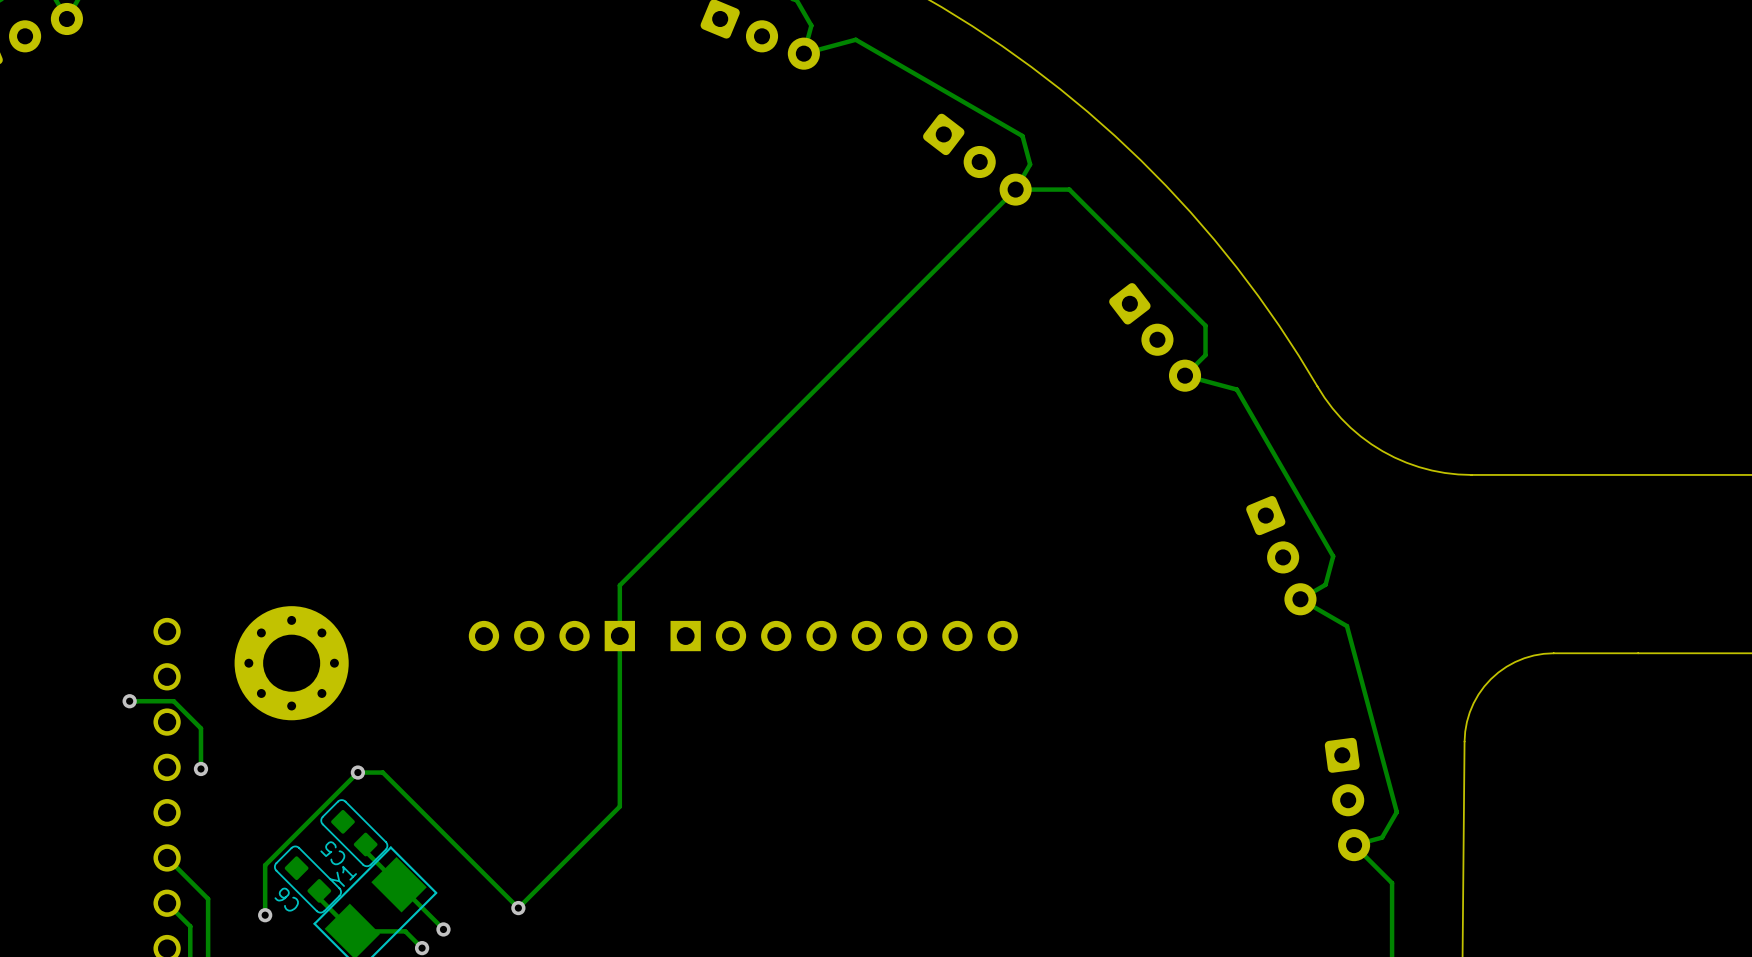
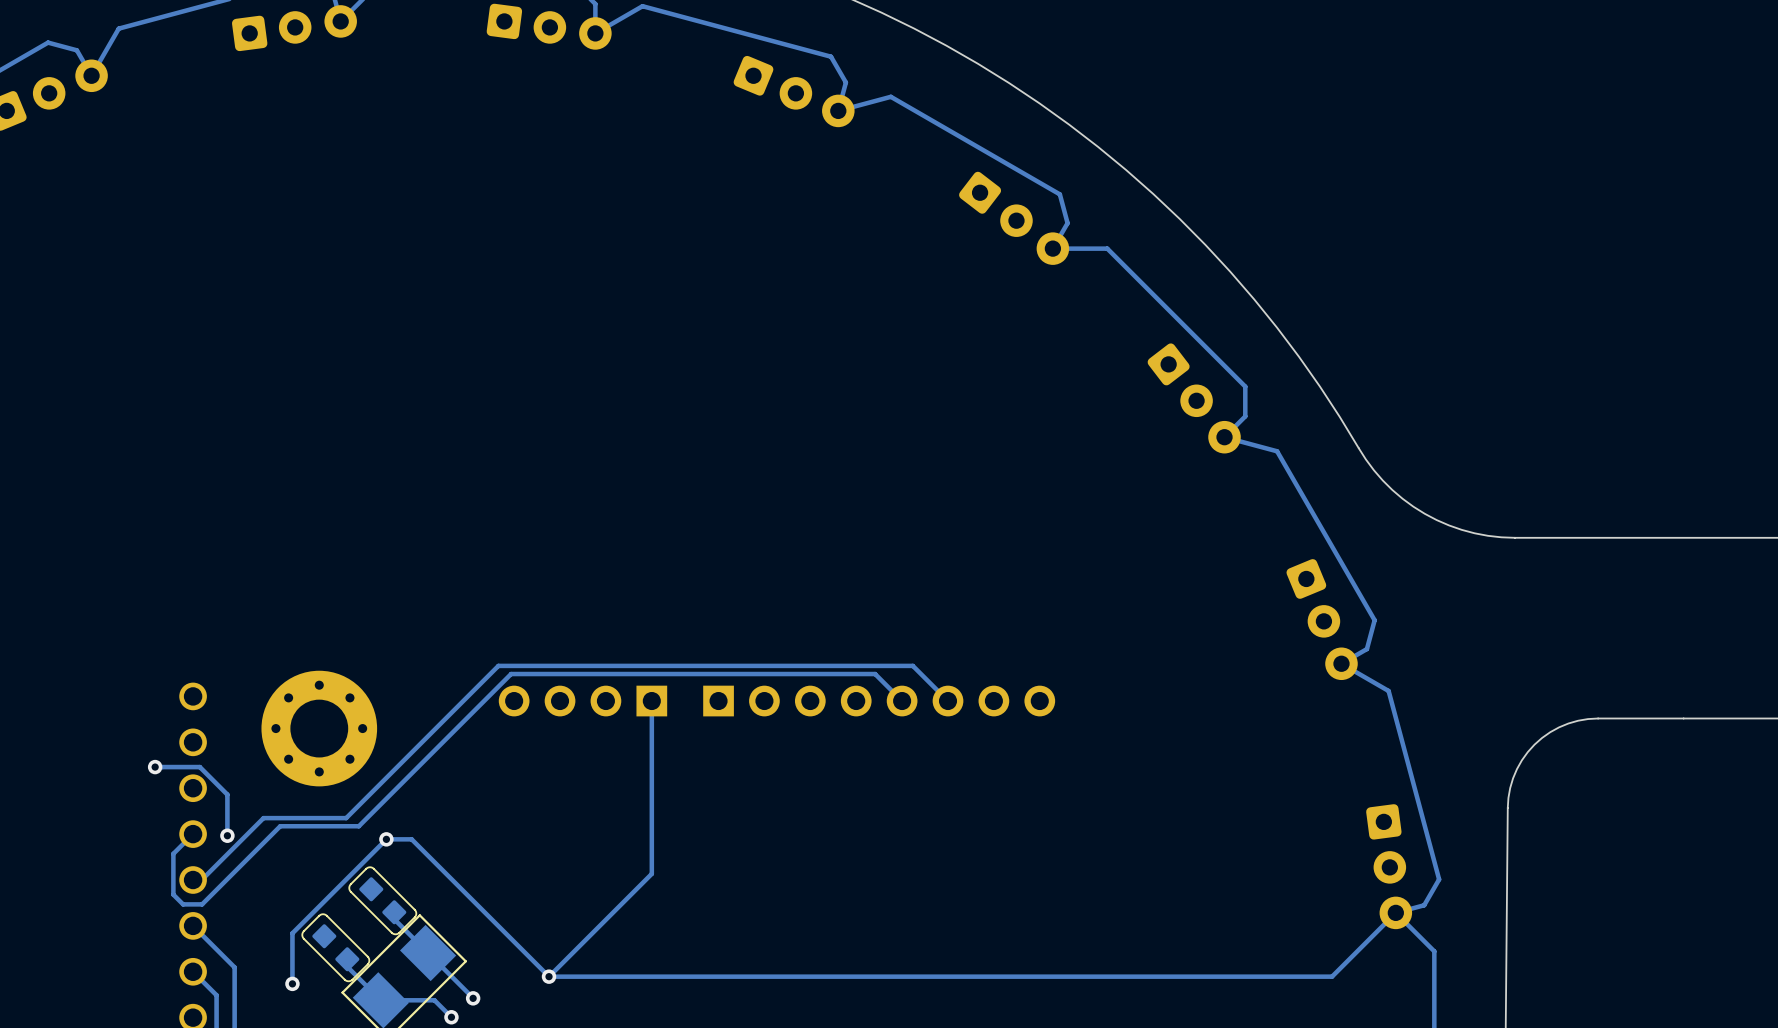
track: (1015, 189) (619, 585) (619, 636) -> none
track: none -> (902, 701) (875, 674) (511, 674) (358, 826) (280, 826) (202, 904) (183, 904) (173, 894) (173, 853) (193, 834)
track: none -> (948, 701) (912, 665) (498, 665) (346, 818) (263, 818) (201, 880) (193, 880)
track: none -> (1395, 912) (1332, 976) (549, 976)
C5 name: C5 (332, 853) -> none
Y1 name: Y1 (343, 876) -> none
C6 name: C6 (286, 899) -> none

